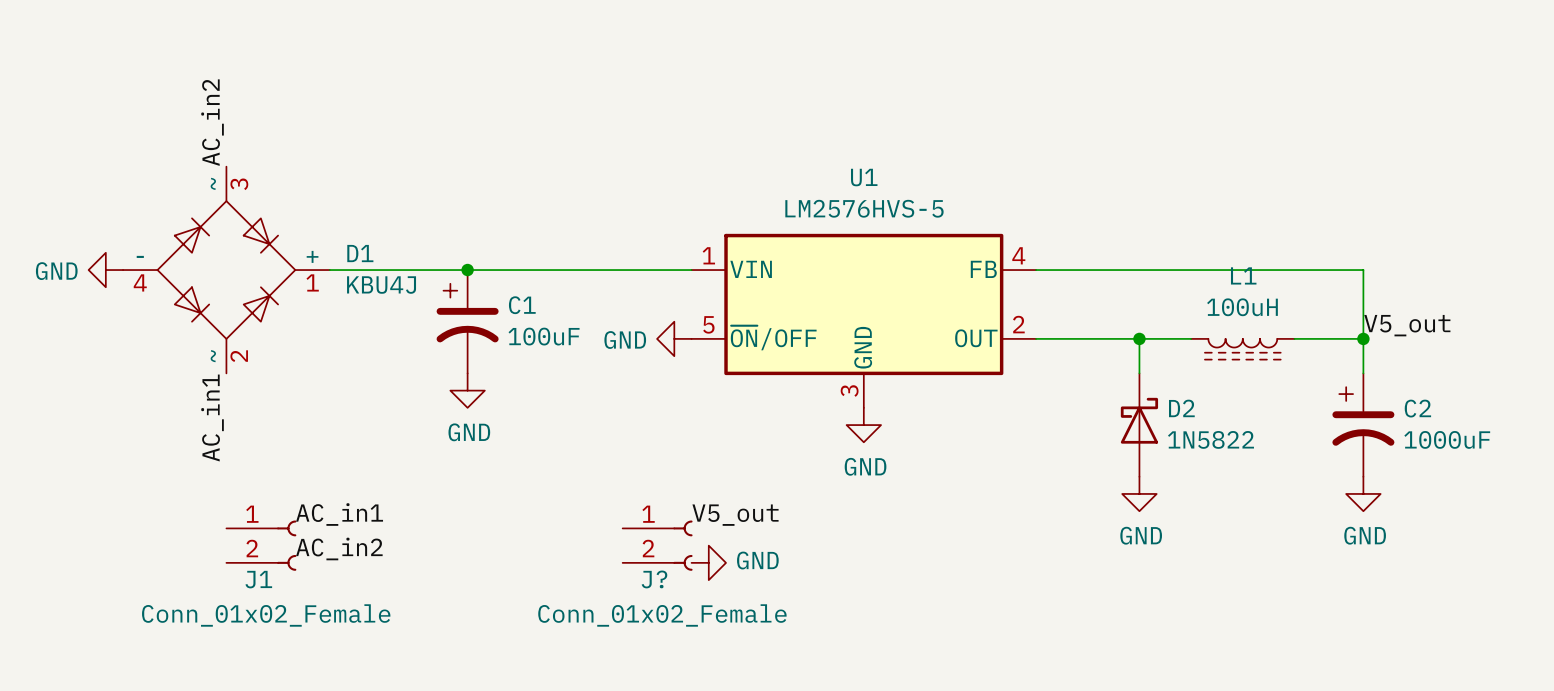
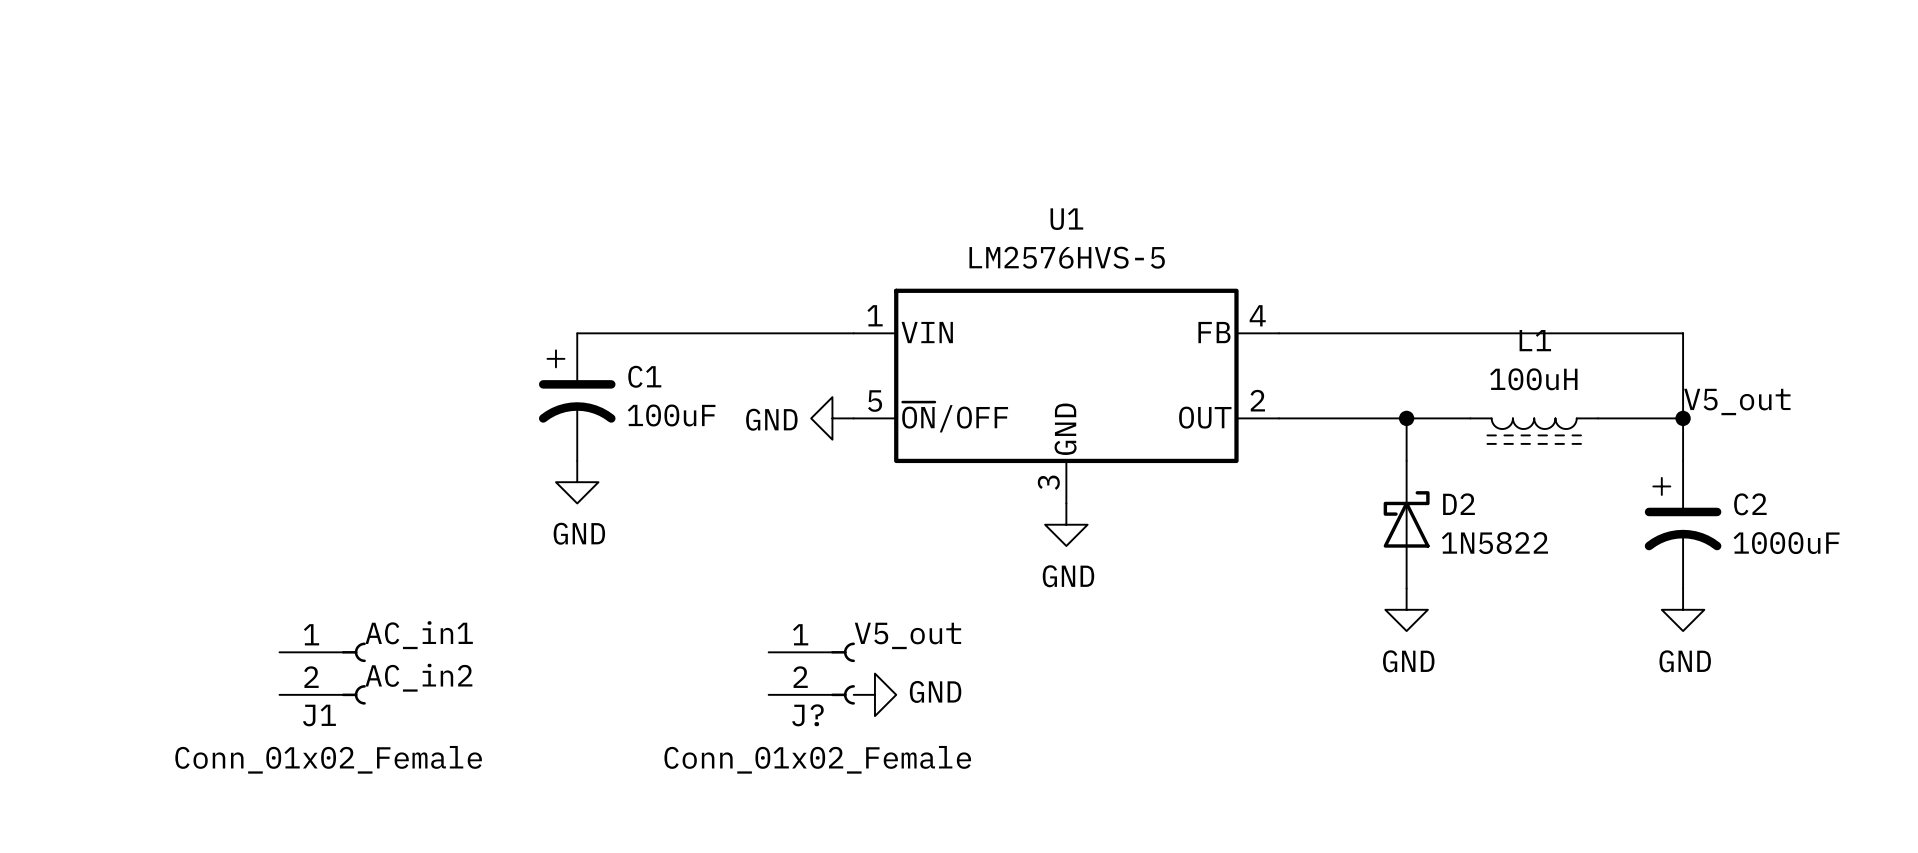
label: AC_in2 (212, 122) -> none
power symbol: GND (105, 270) -> none
D1: KBU4J (226, 270) -> none
wire: (329, 270) (467, 270) -> none
junction: (467, 270) -> none
label: AC_in1 (212, 418) -> none

